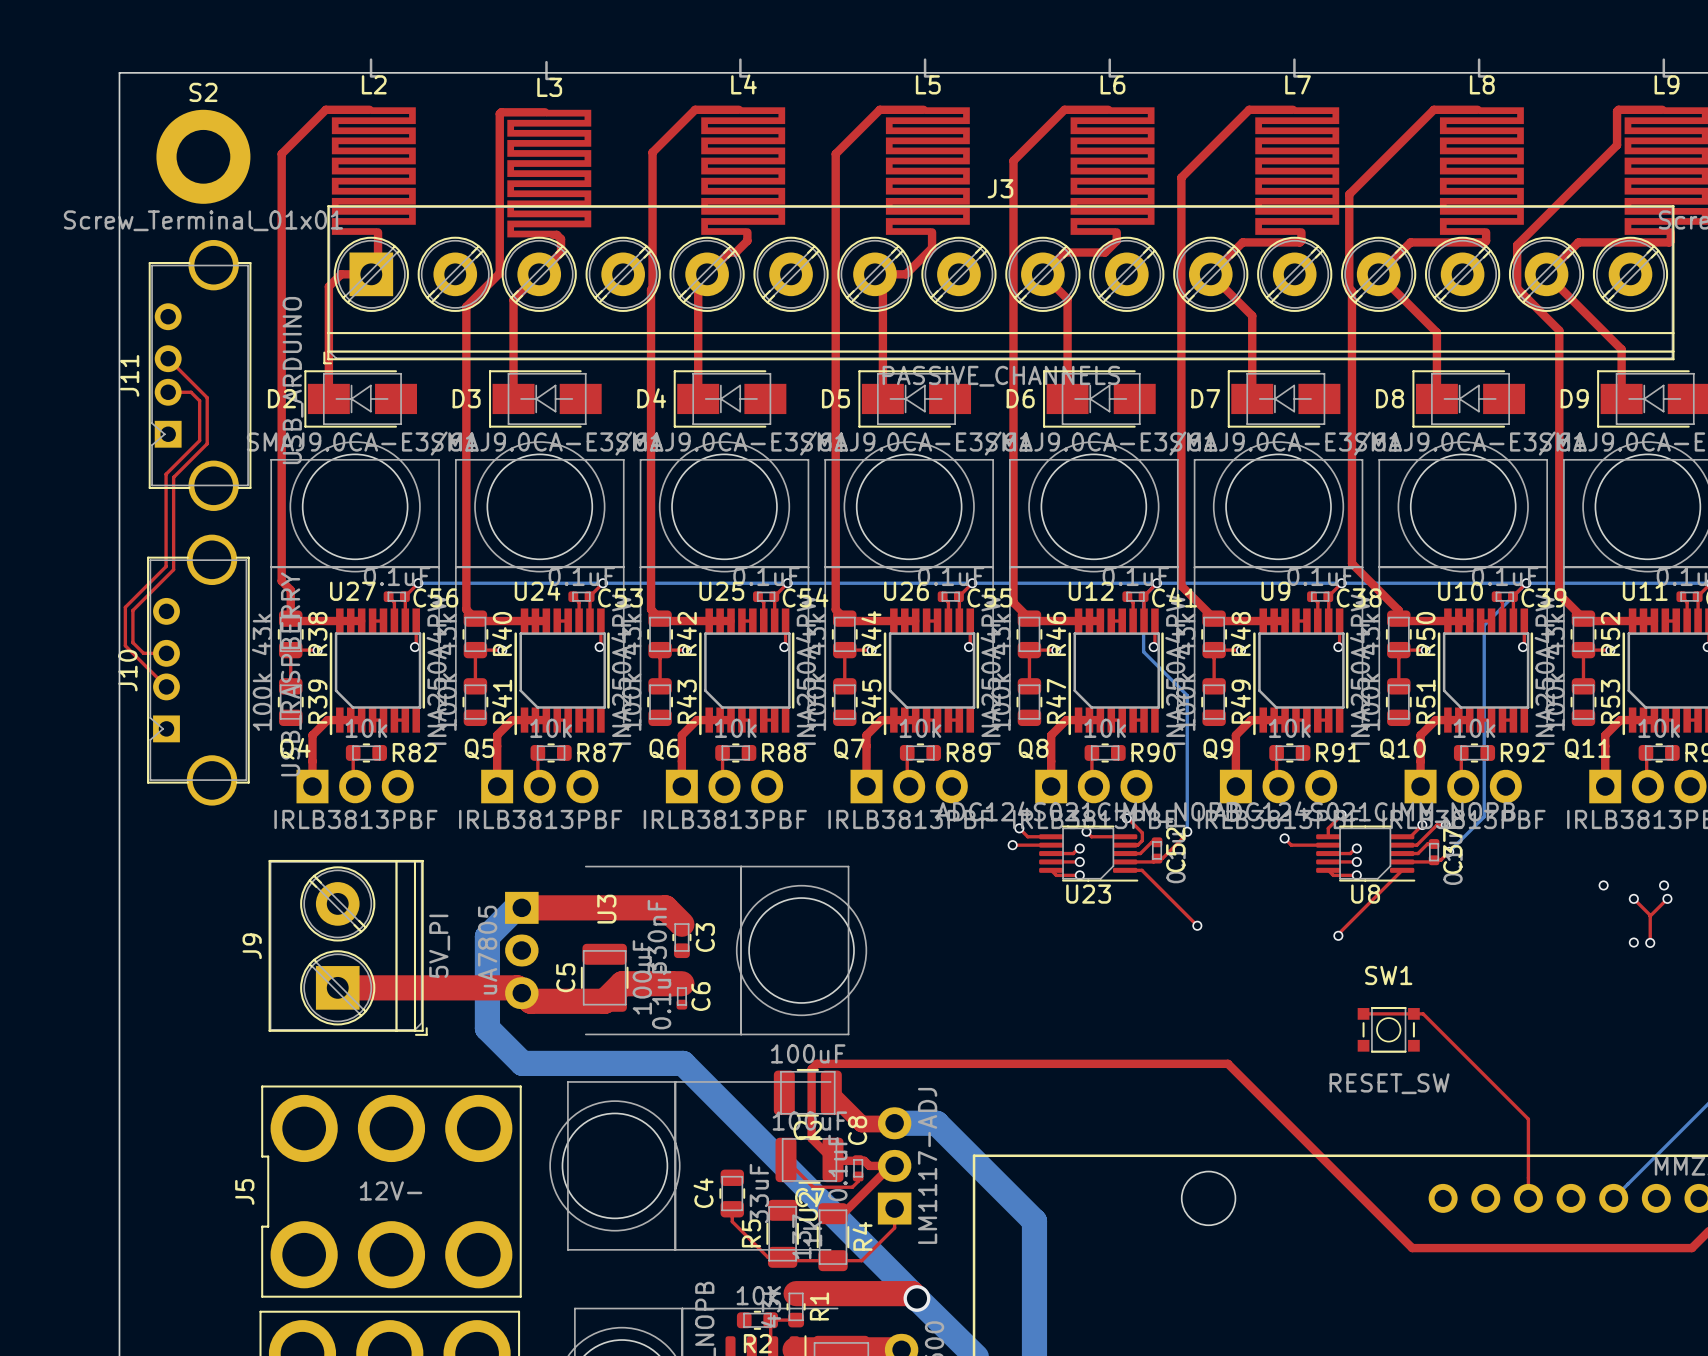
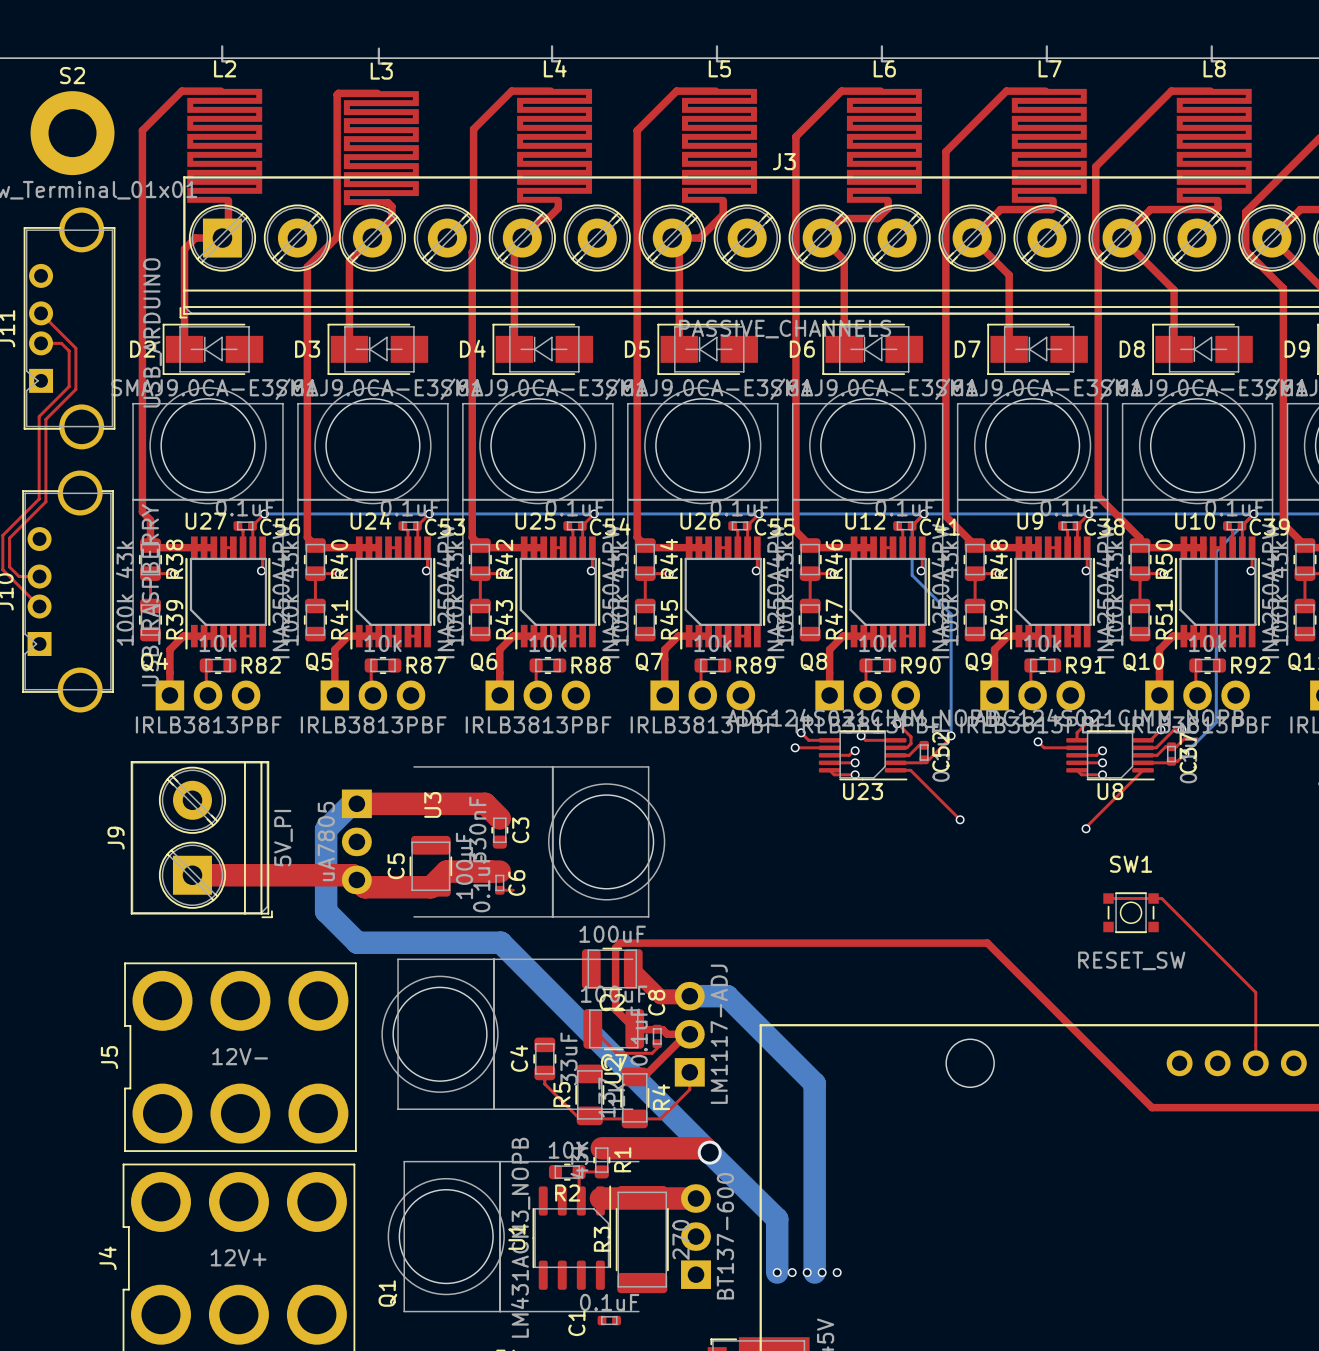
top track: none -> (1197, 738) (1184, 738) (1176, 746) (1171, 746)
top track: none -> (499, 890) (513, 890)

